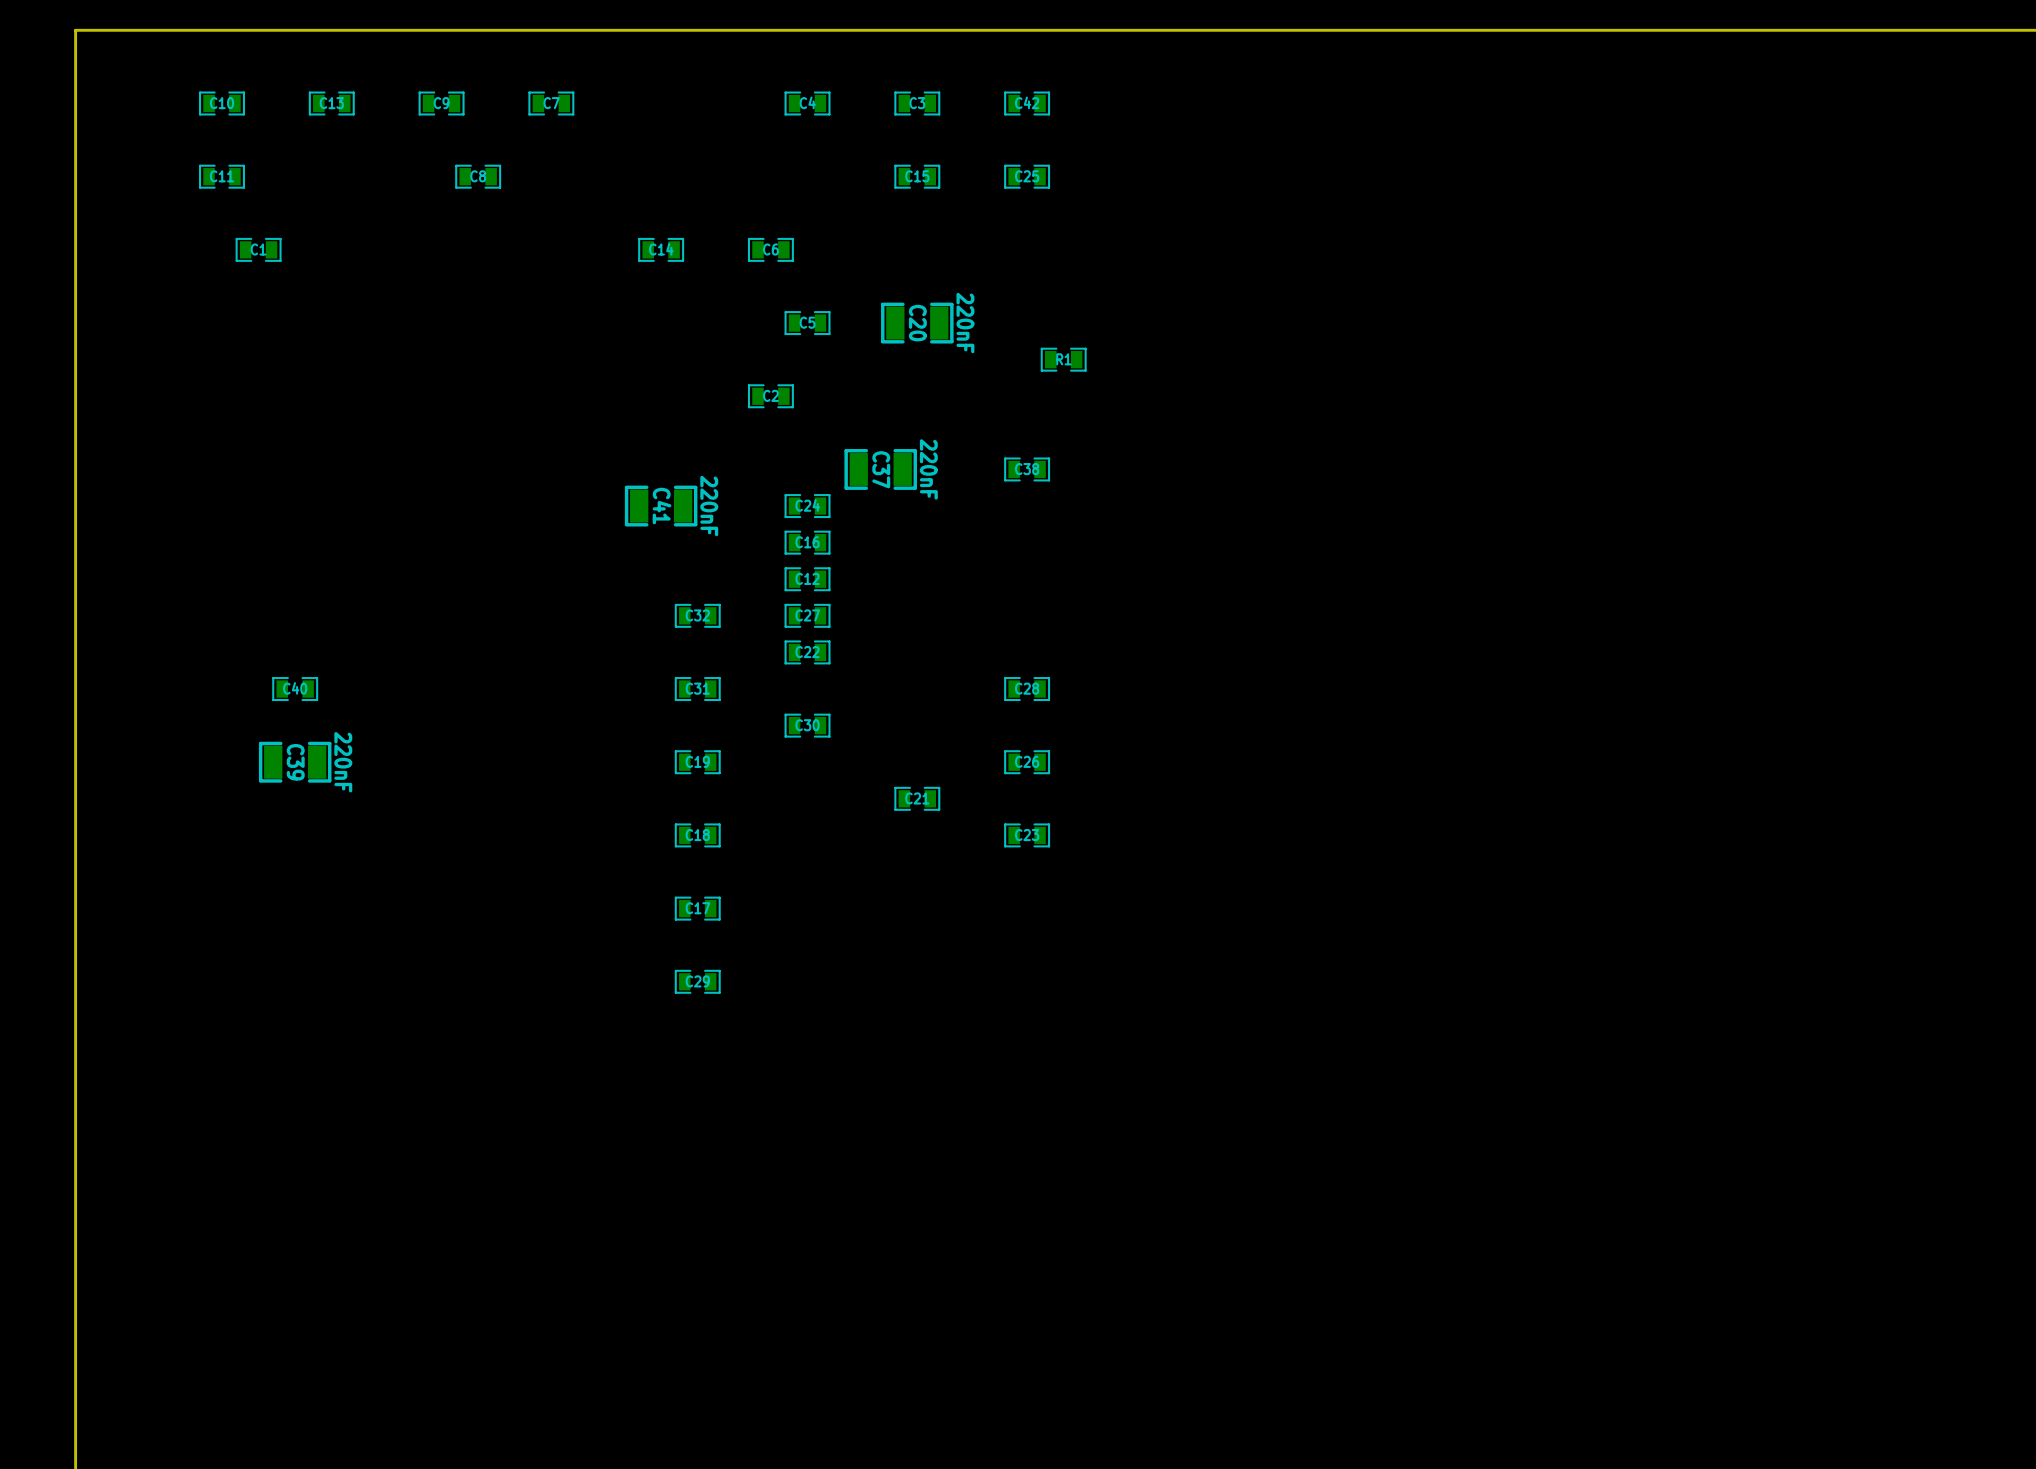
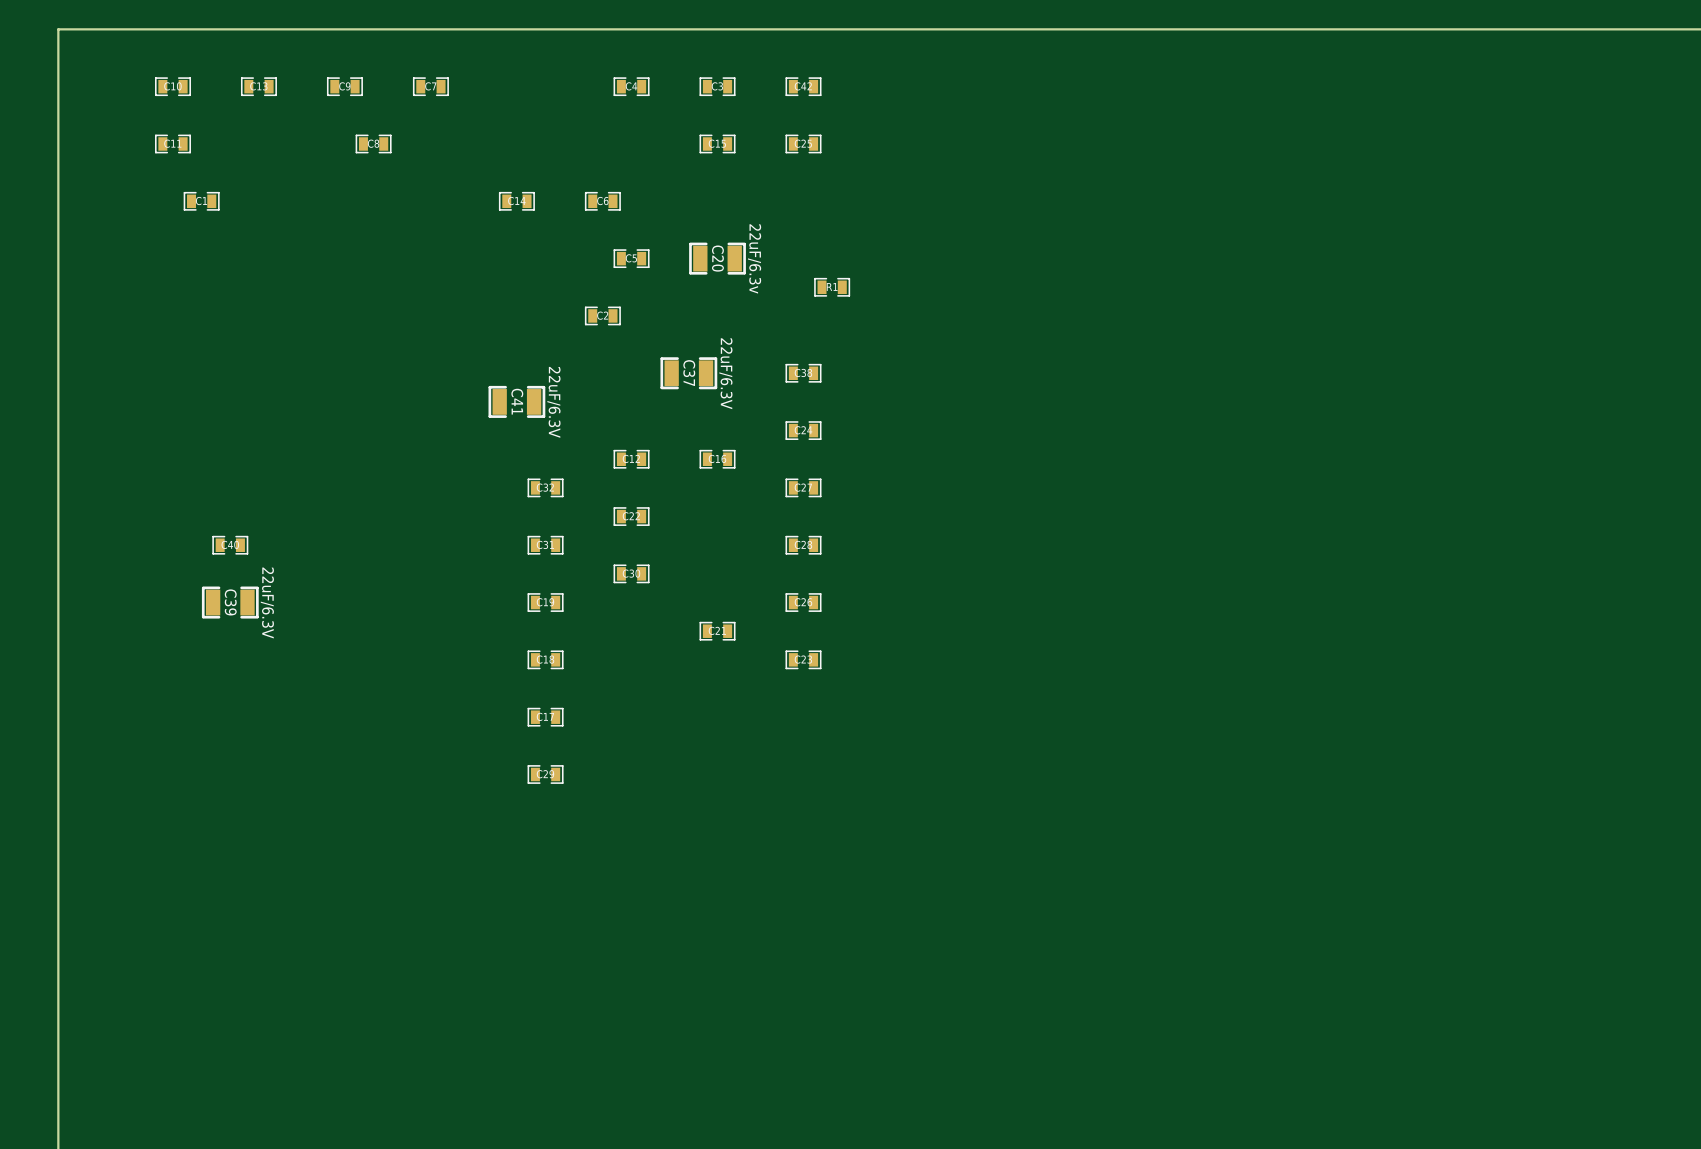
C20 value: 220nF (965, 323) -> 22uF/6.3v (754, 258)
C37 value: 220nF (928, 469) -> 22uF/6.3V (725, 373)
C41 value: 220nF (709, 506) -> 22uF/6.3V (553, 402)
C24 position: (807, 506) -> (803, 430)
C16 position: (807, 542) -> (717, 459)
C27 position: (807, 615) -> (803, 487)
C39 value: 220nF (343, 762) -> 22uF/6.3V (267, 603)

